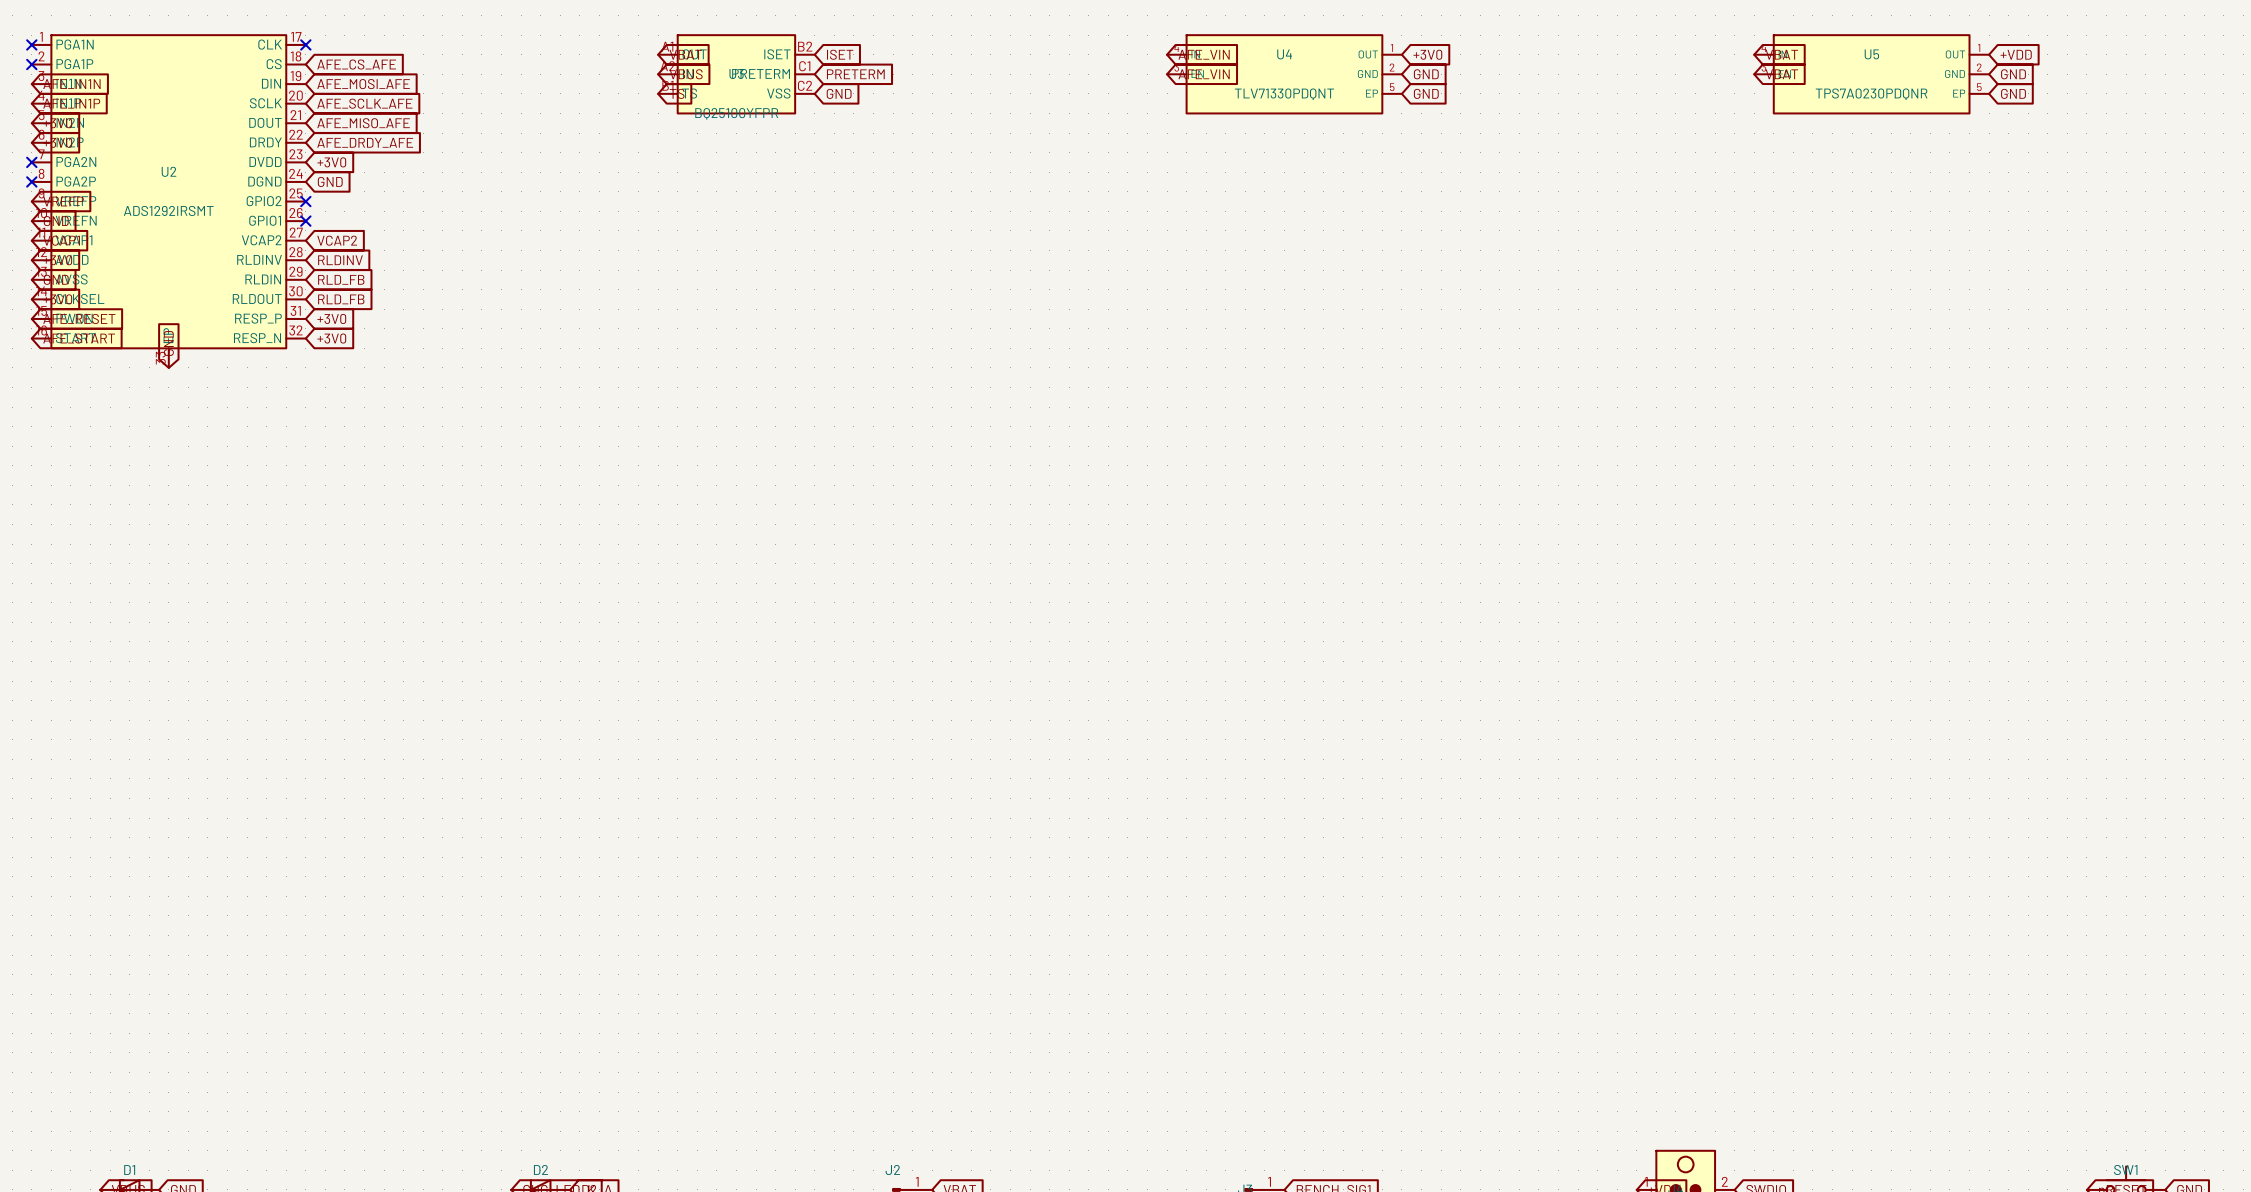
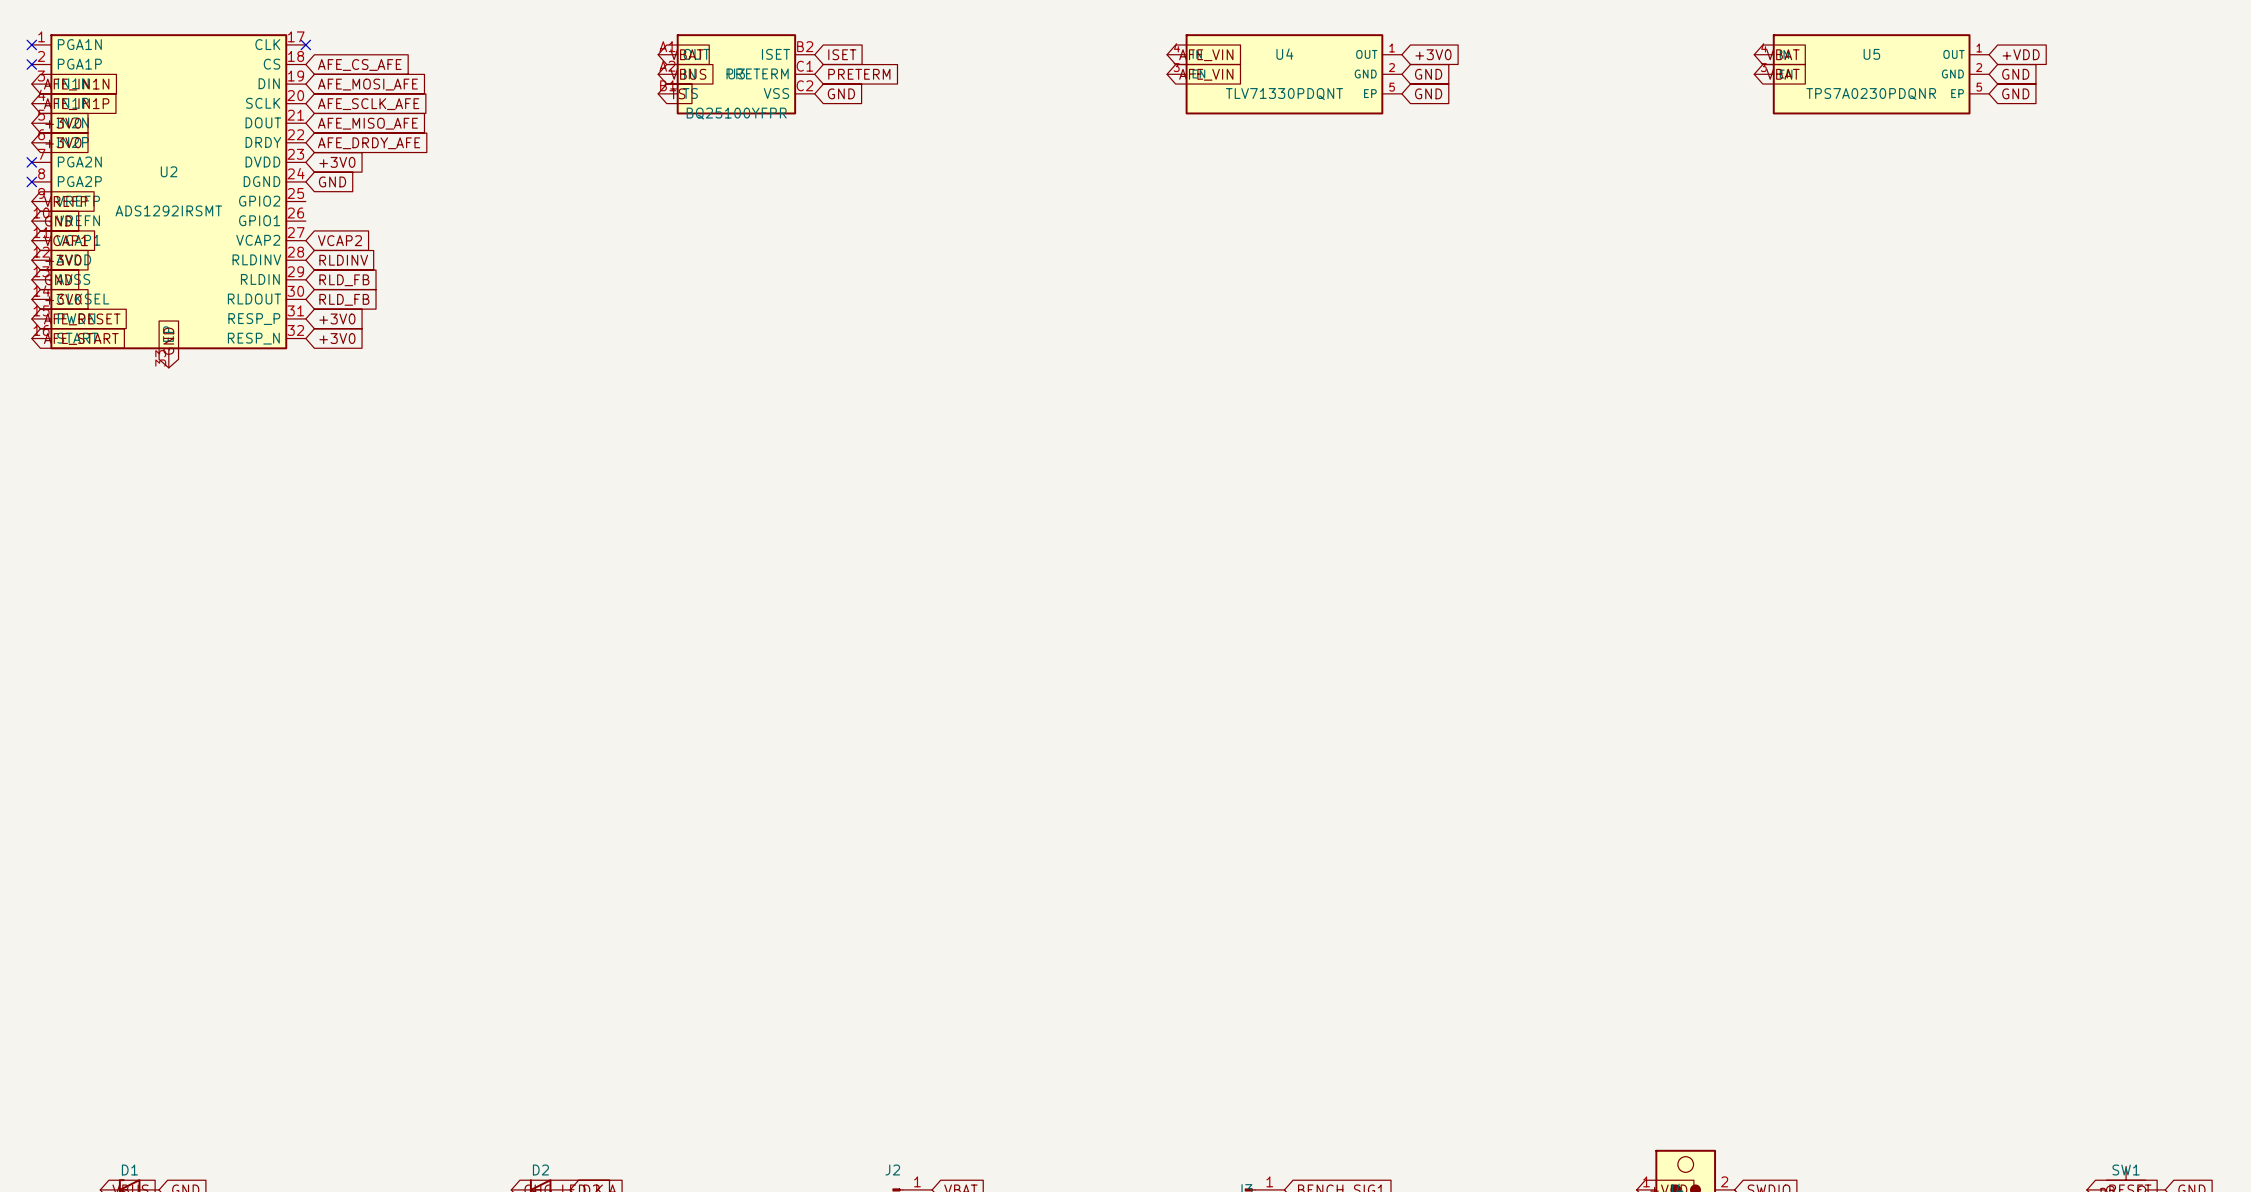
no-connect mark: (305, 201) -> none
no-connect mark: (305, 221) -> none

